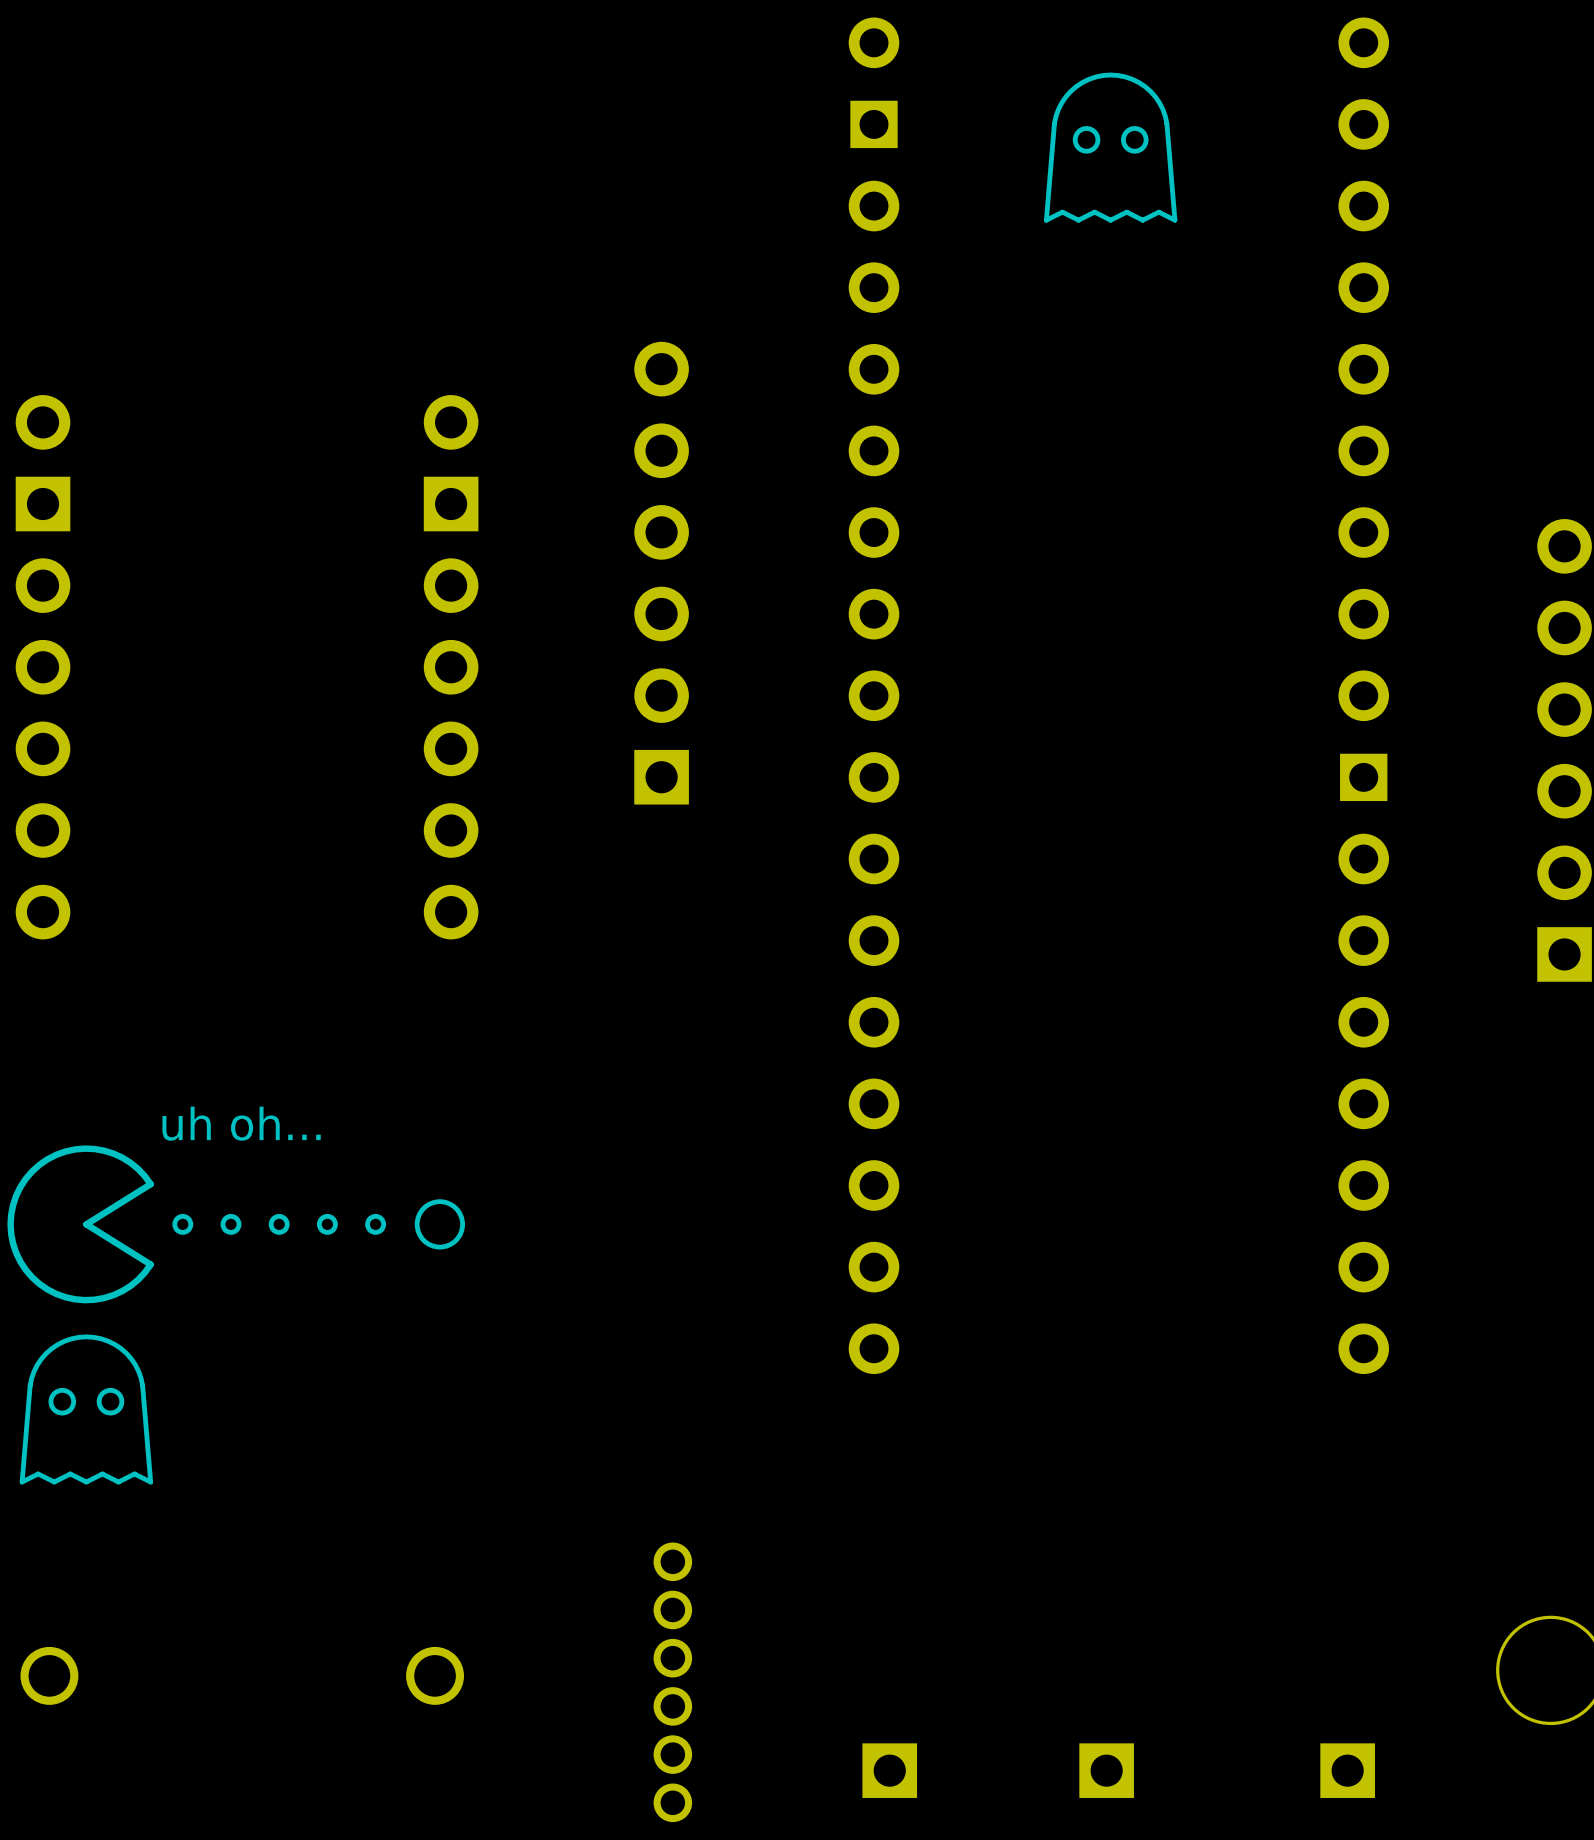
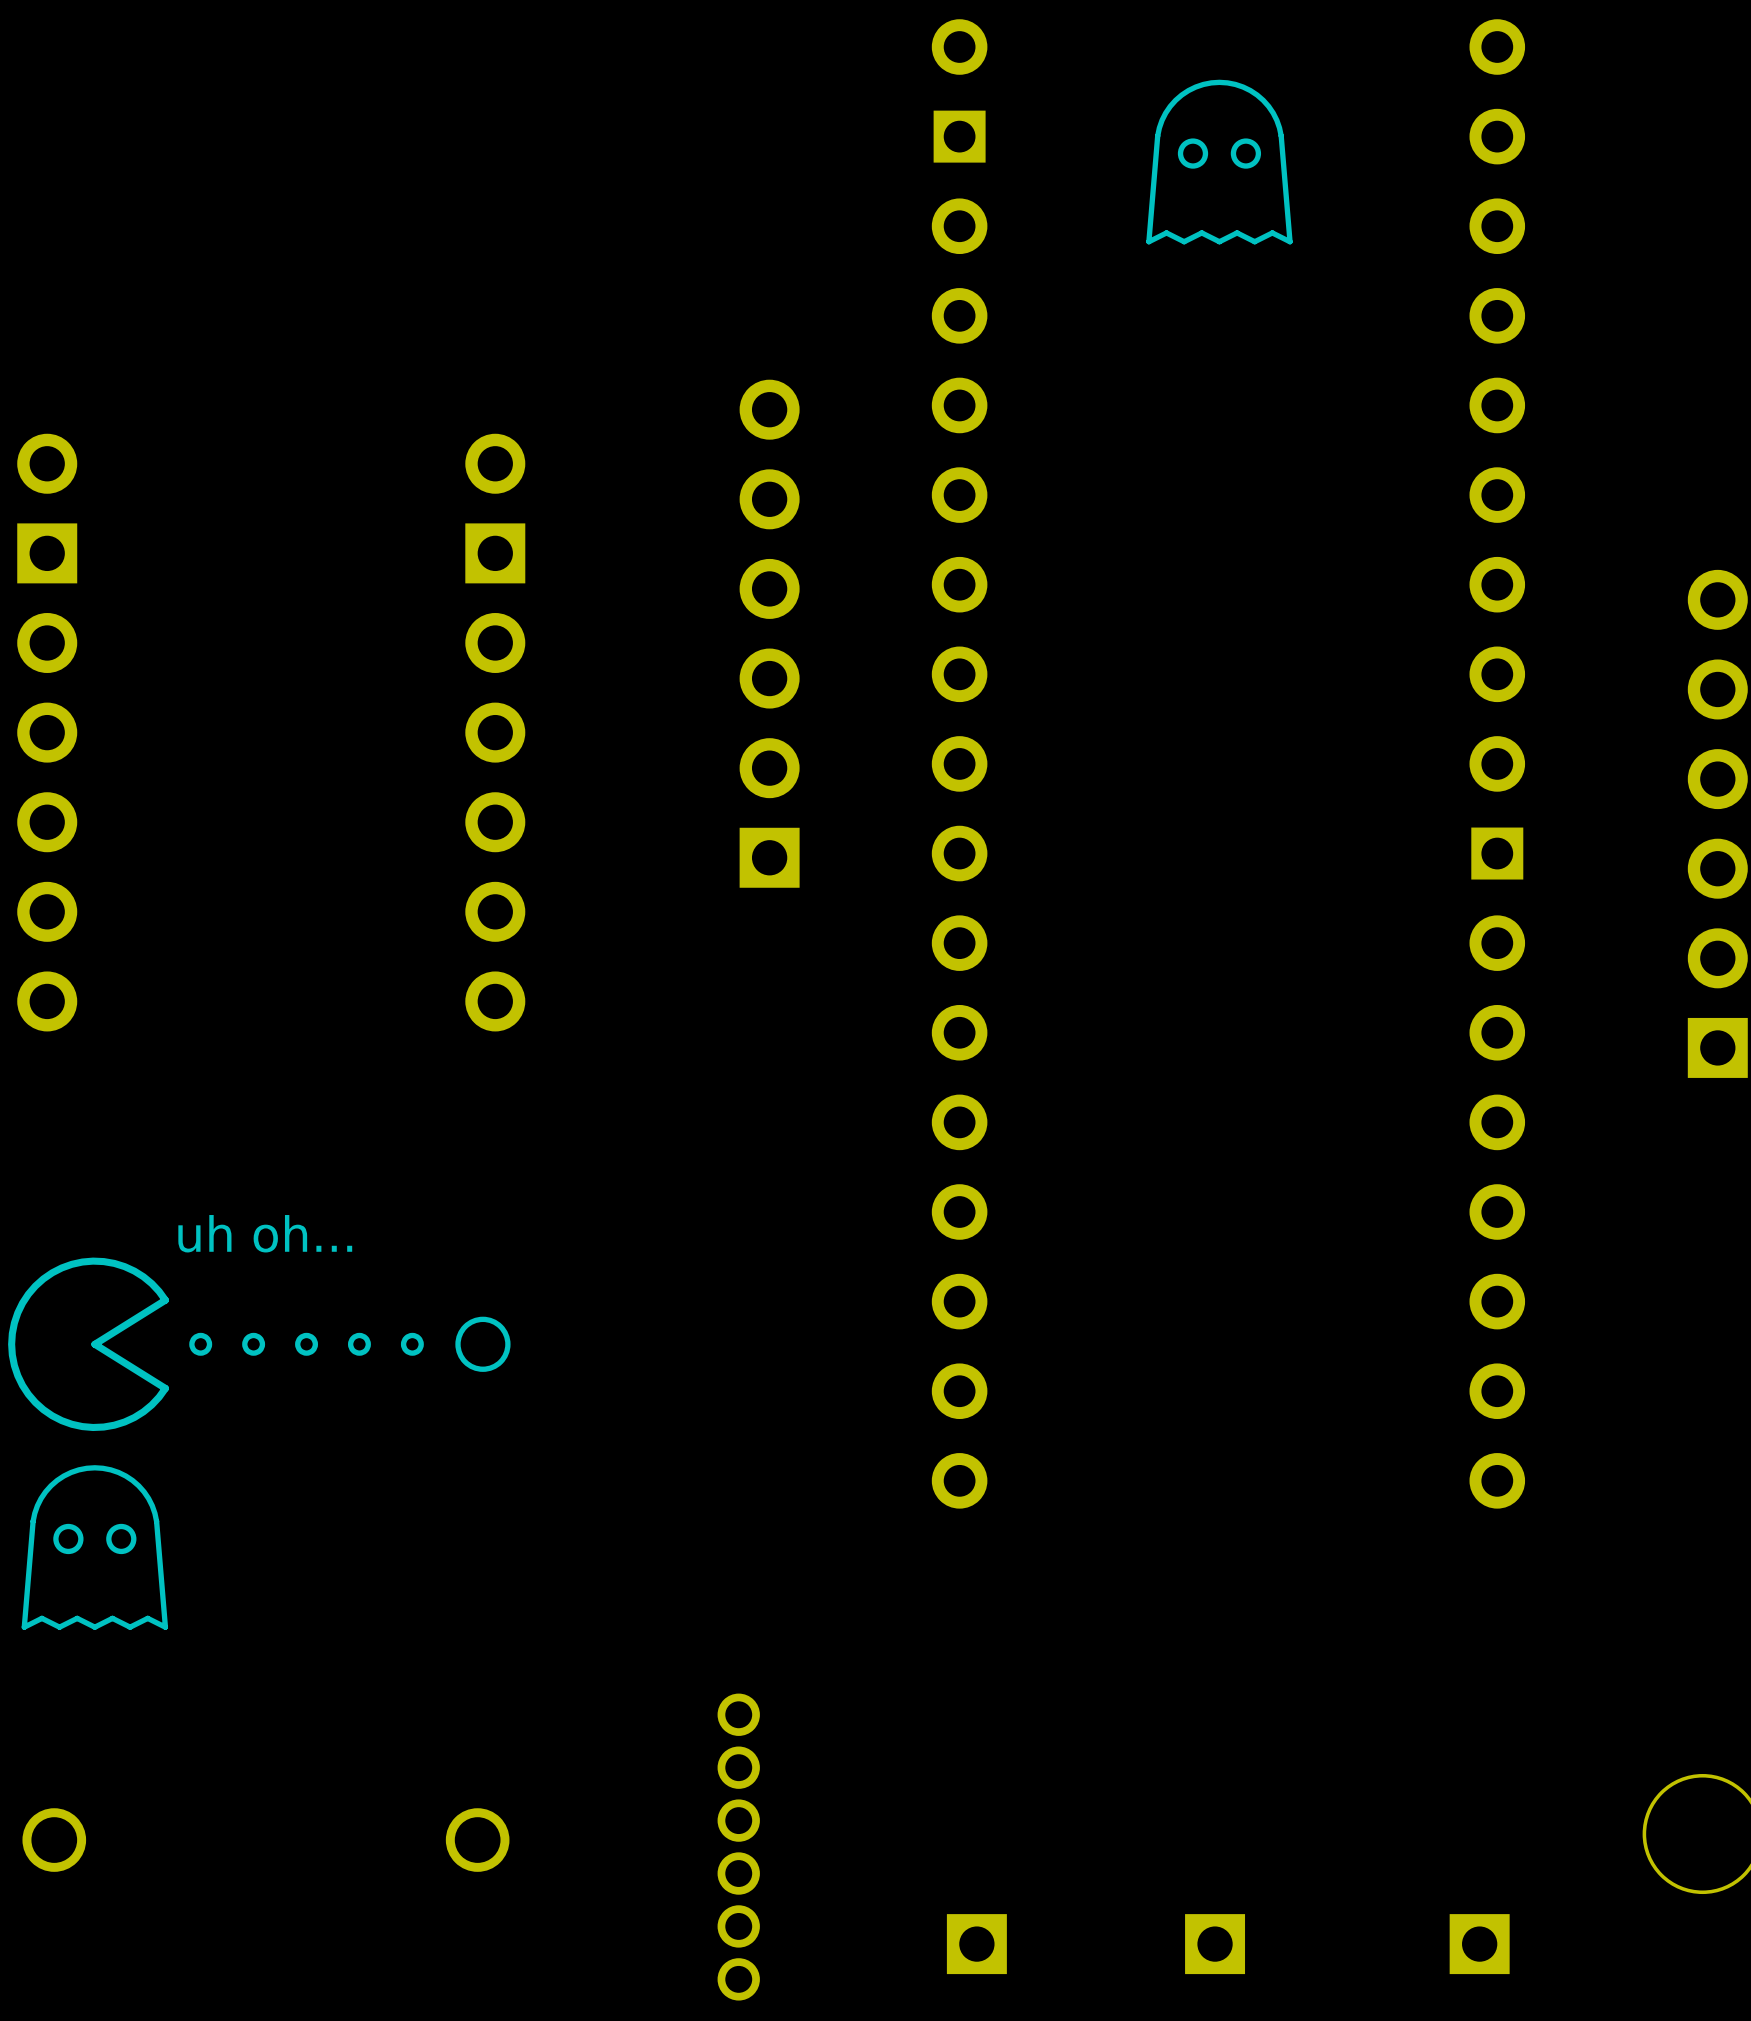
part position: (661, 573) -> (769, 633)

